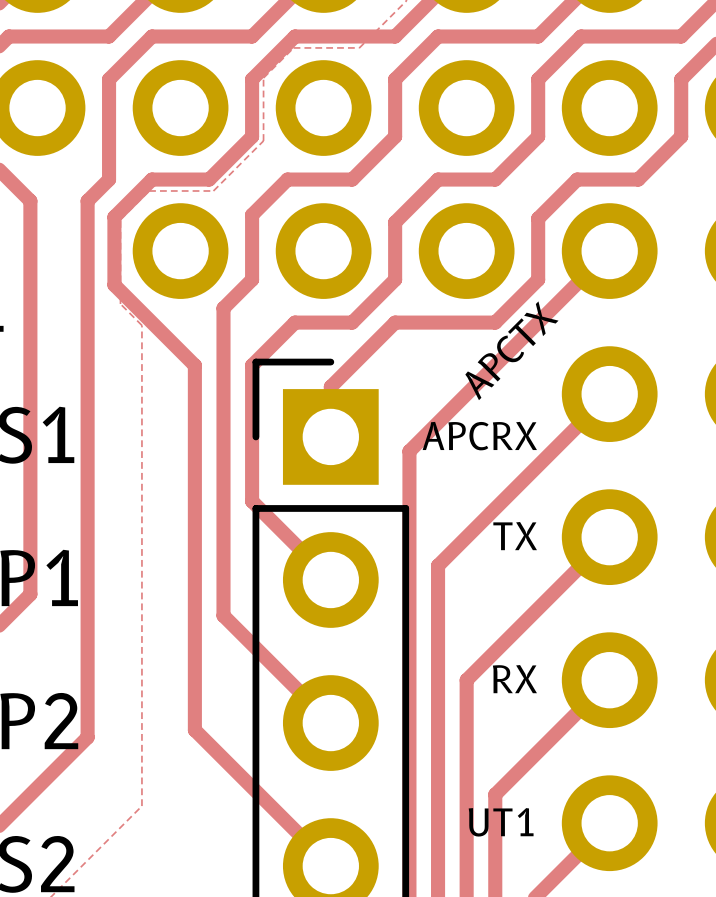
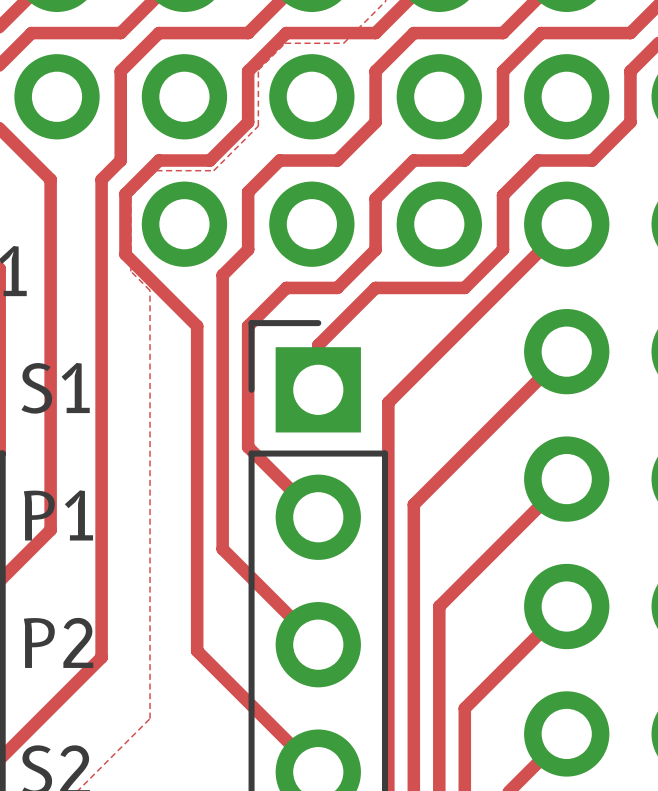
text: APCTX (511, 350) -> none
text: APCRX (479, 436) -> none
text: TX (515, 536) -> none
text: RX (514, 679) -> none
text: UT1 (501, 822) -> none

